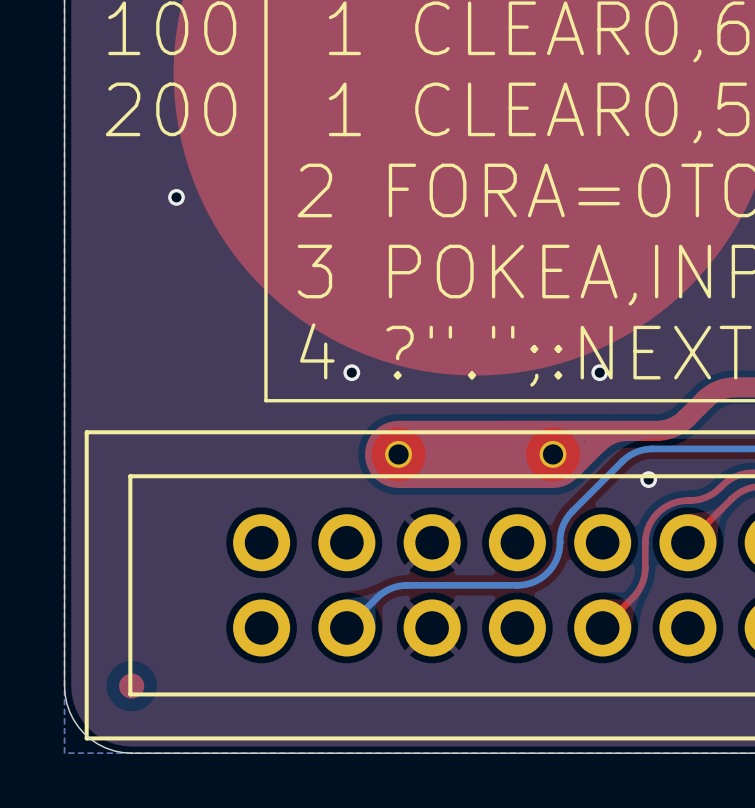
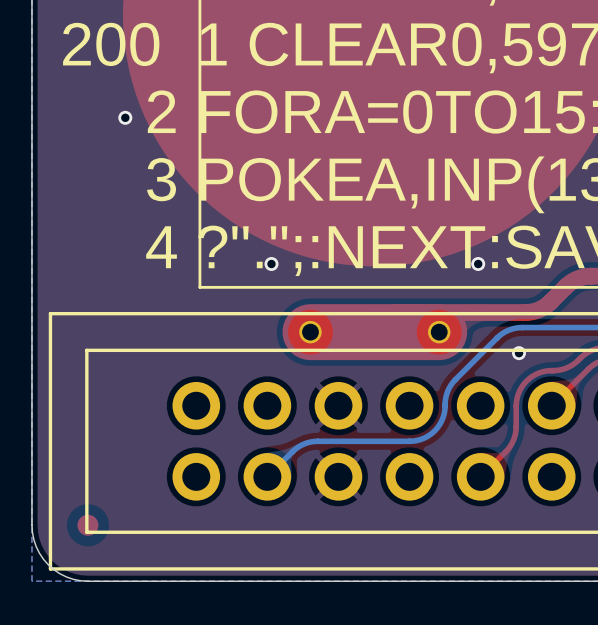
top track: (627, 430) (615, 432) (604, 438) (571, 469) -> none

